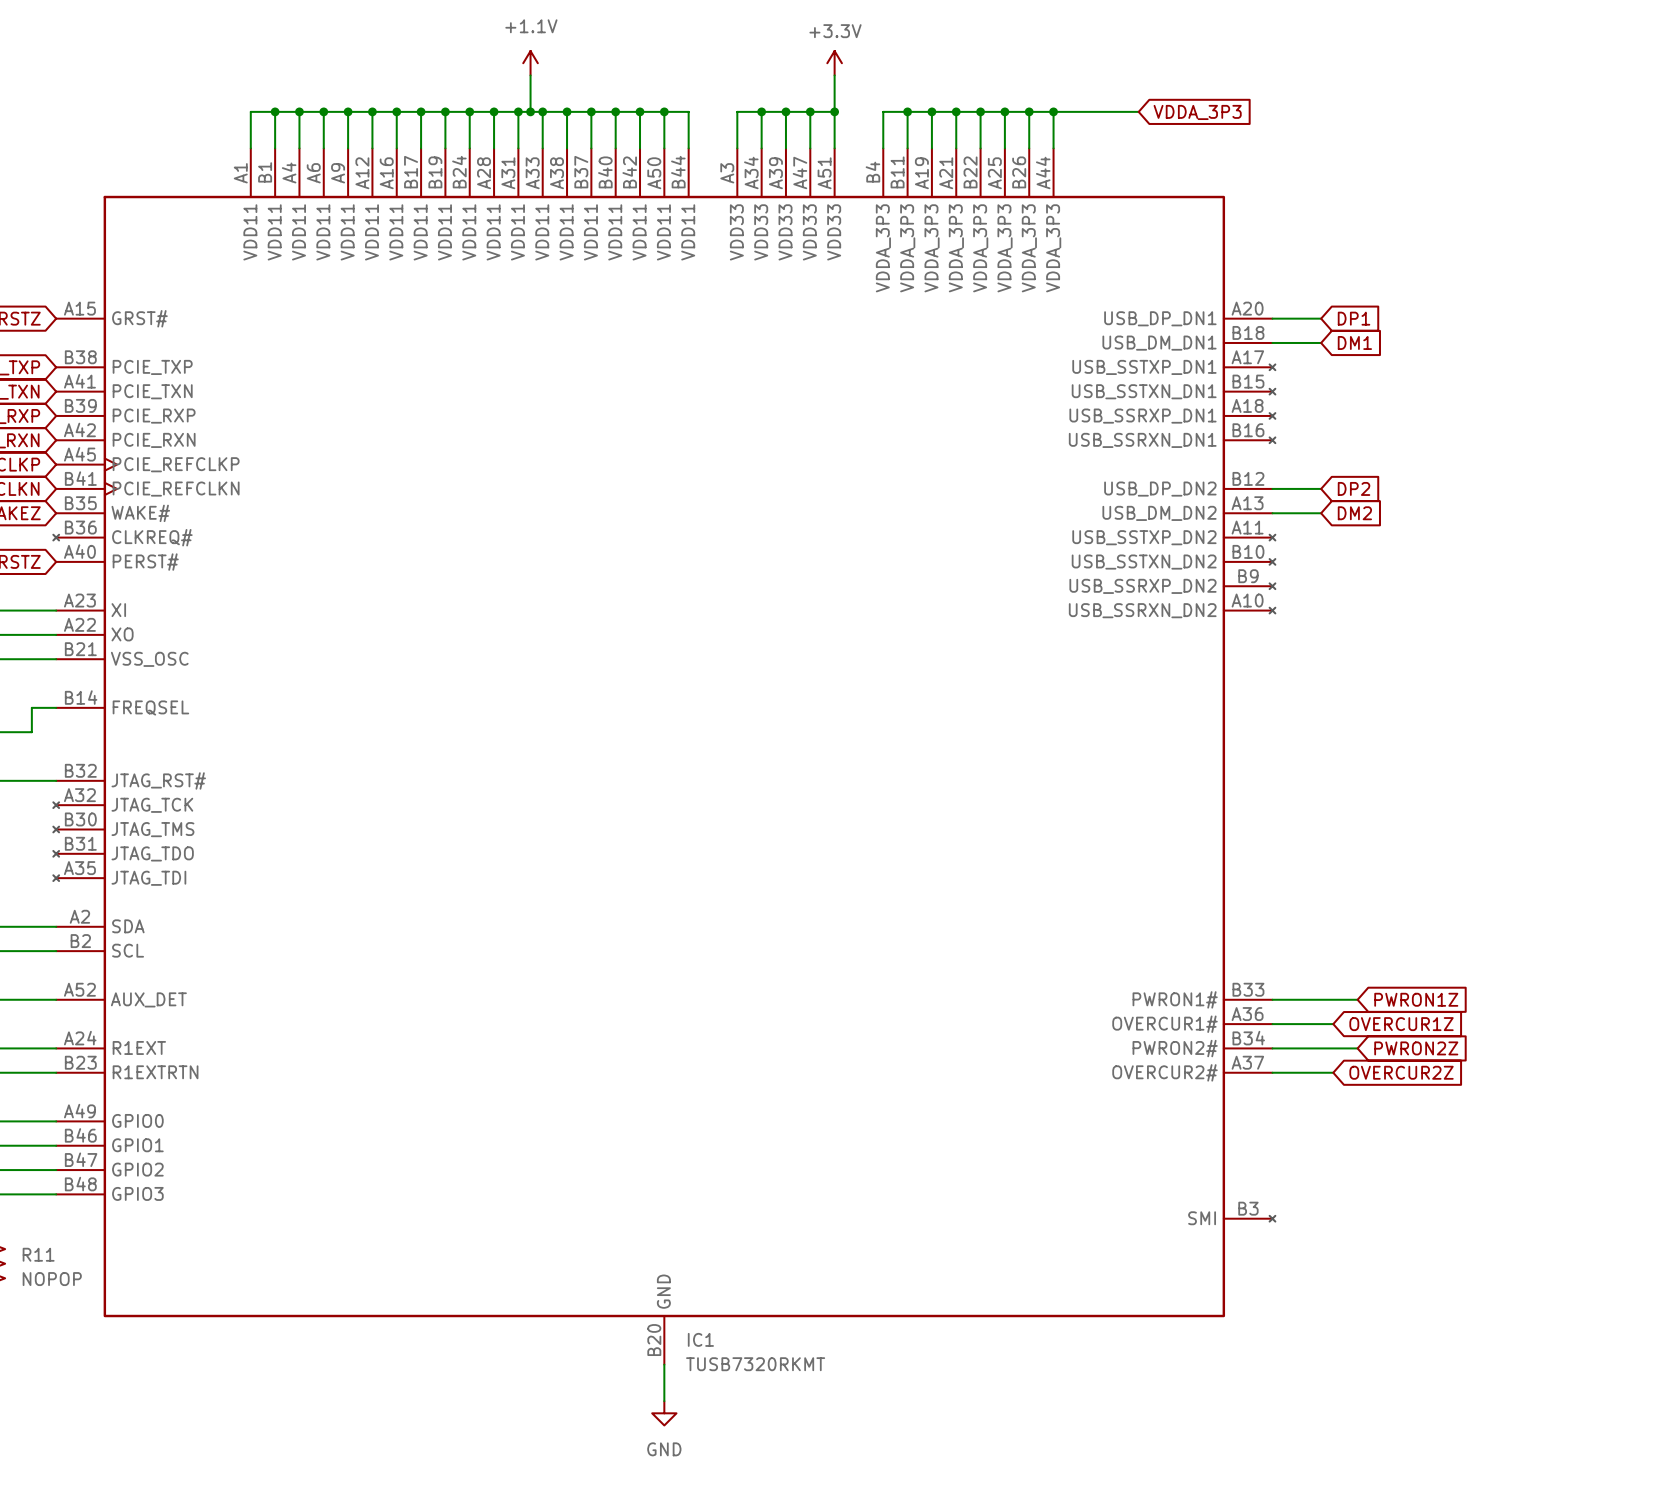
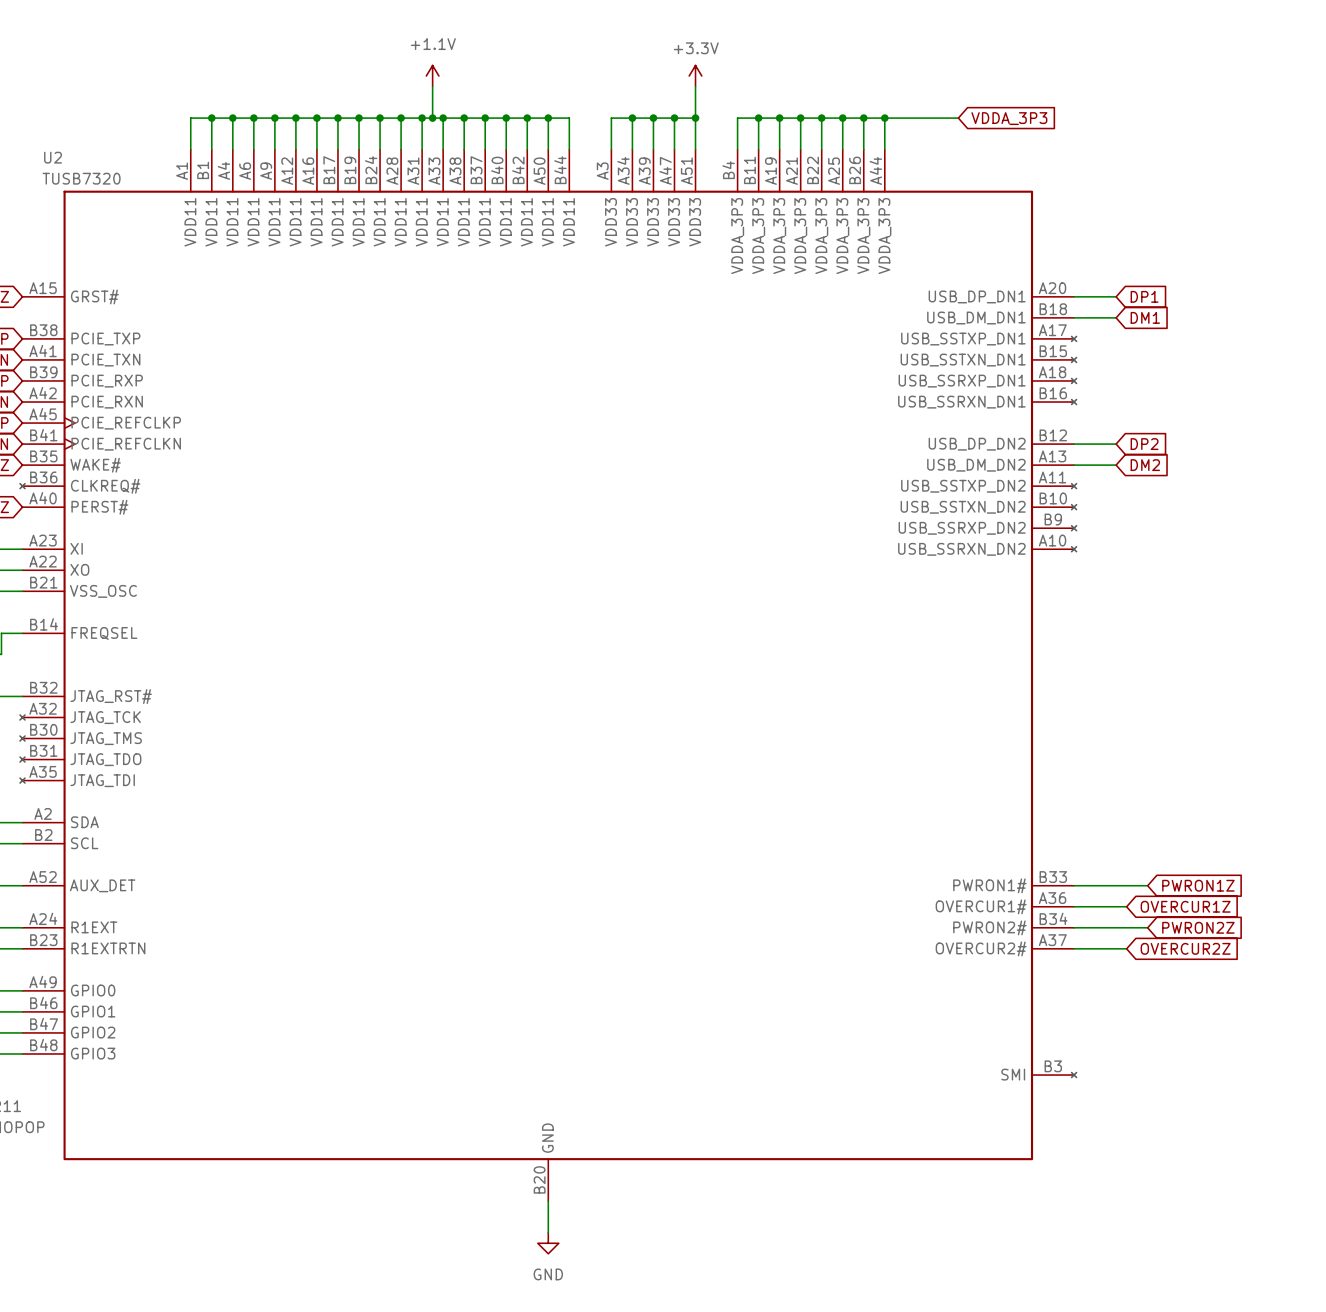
IC1 name: IC1 (700, 1339) -> U2 (53, 157)
IC1 value: TUSB7320RKMT (755, 1364) -> TUSB7320 (81, 178)

